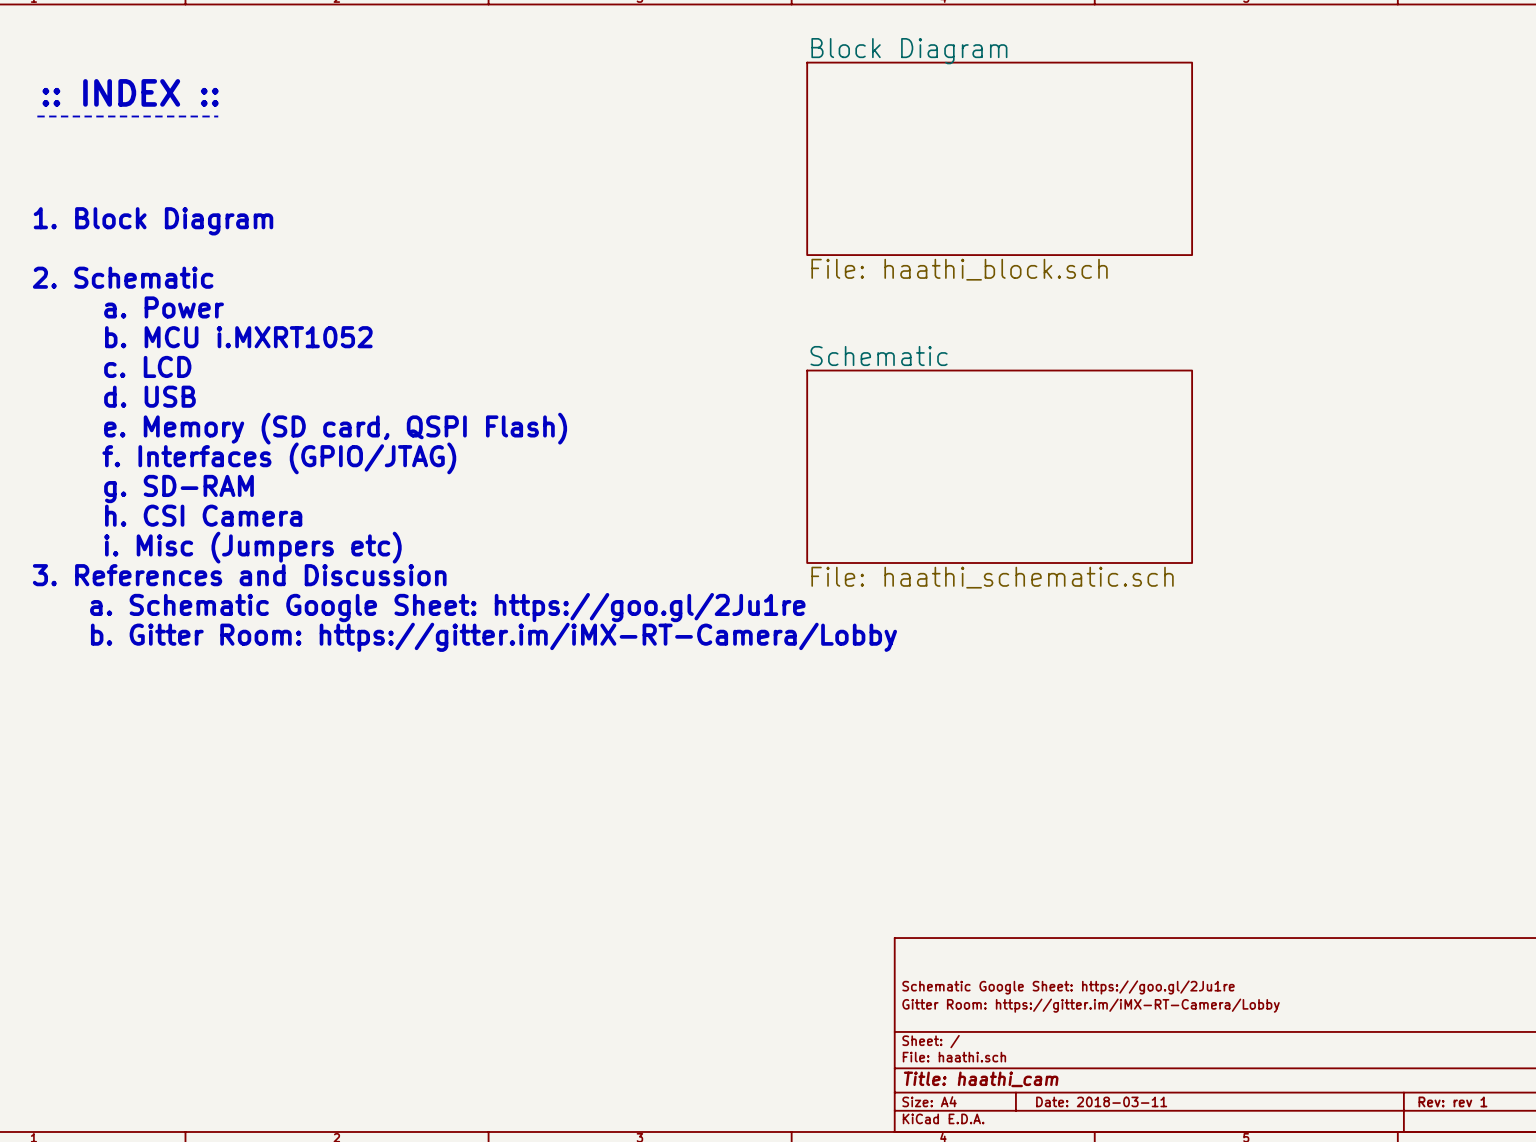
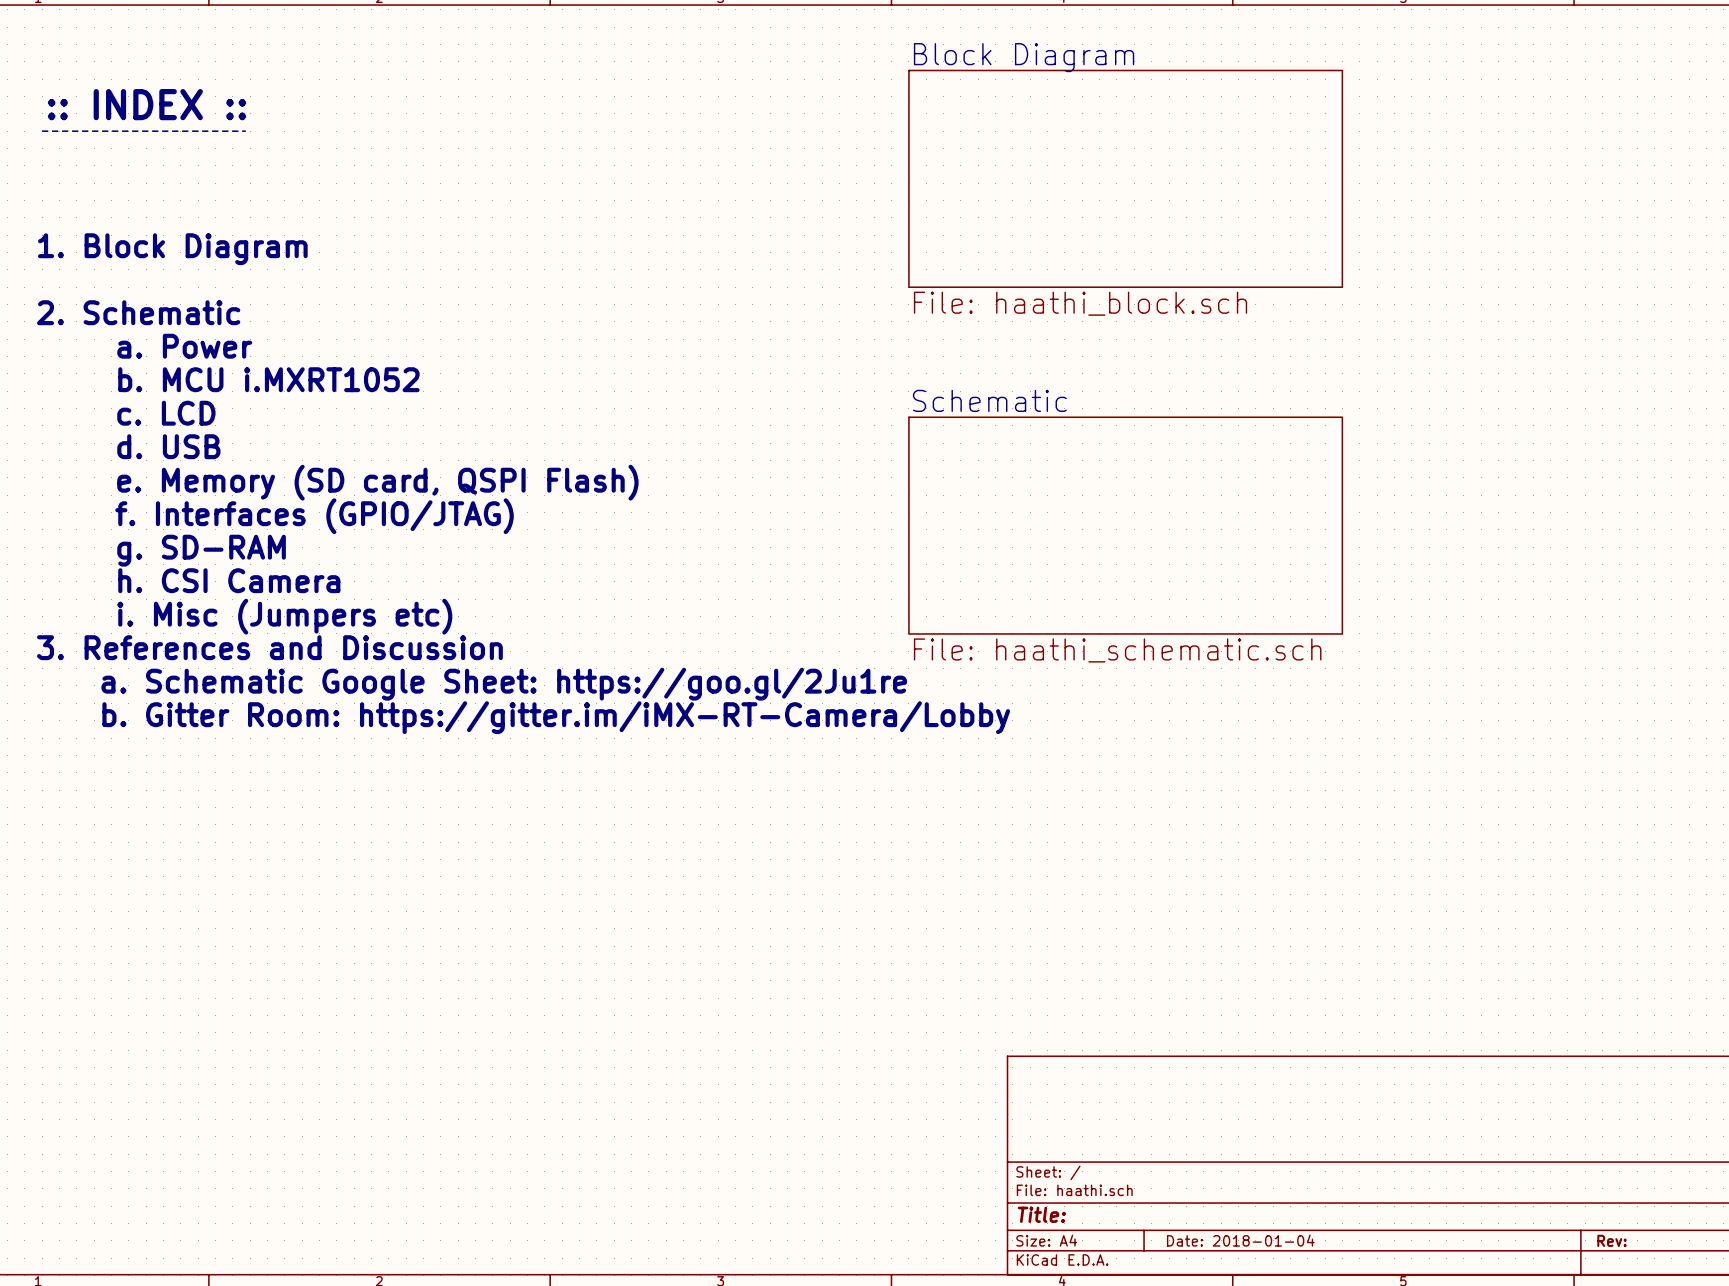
title block: Schematic Google Sheet: https://goo.gl/2Ju1re (1068, 987) -> none
title block: Gitter Room: https://gitter.im/iMX-RT-Camera/Lobby (1091, 1005) -> none
title block: Title: haathi_cam (981, 1079) -> Title: (1041, 1214)
title block: Date: 2018-03-11 (1101, 1101) -> Date: 2018-01-04 (1240, 1240)
title block: Rev: rev 1 (1452, 1101) -> Rev: (1611, 1240)

